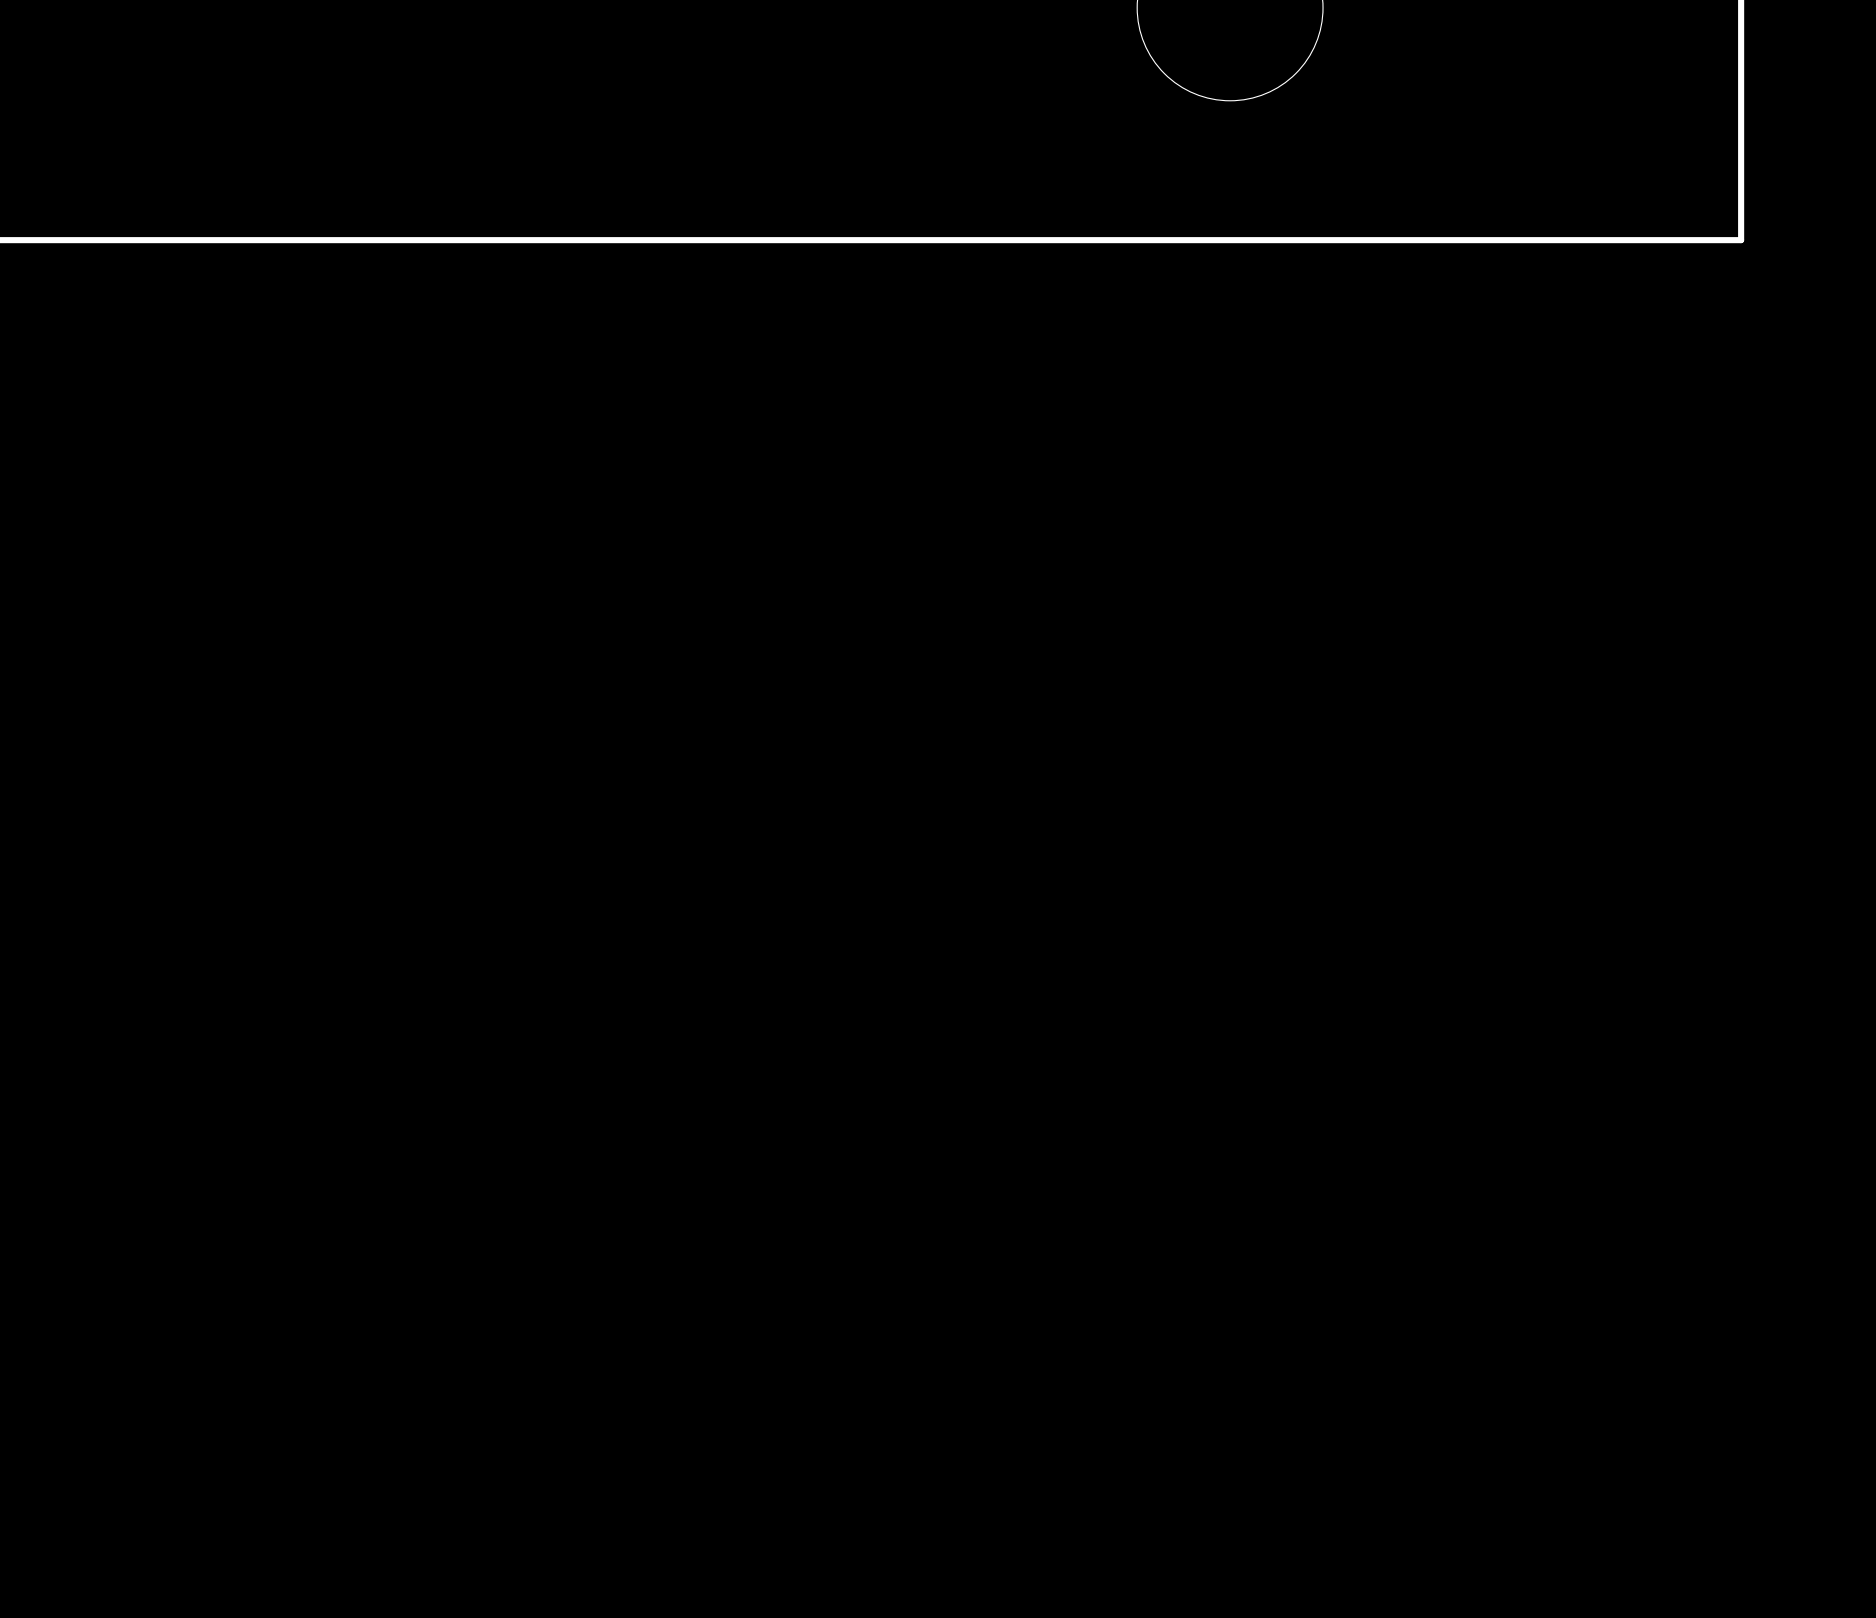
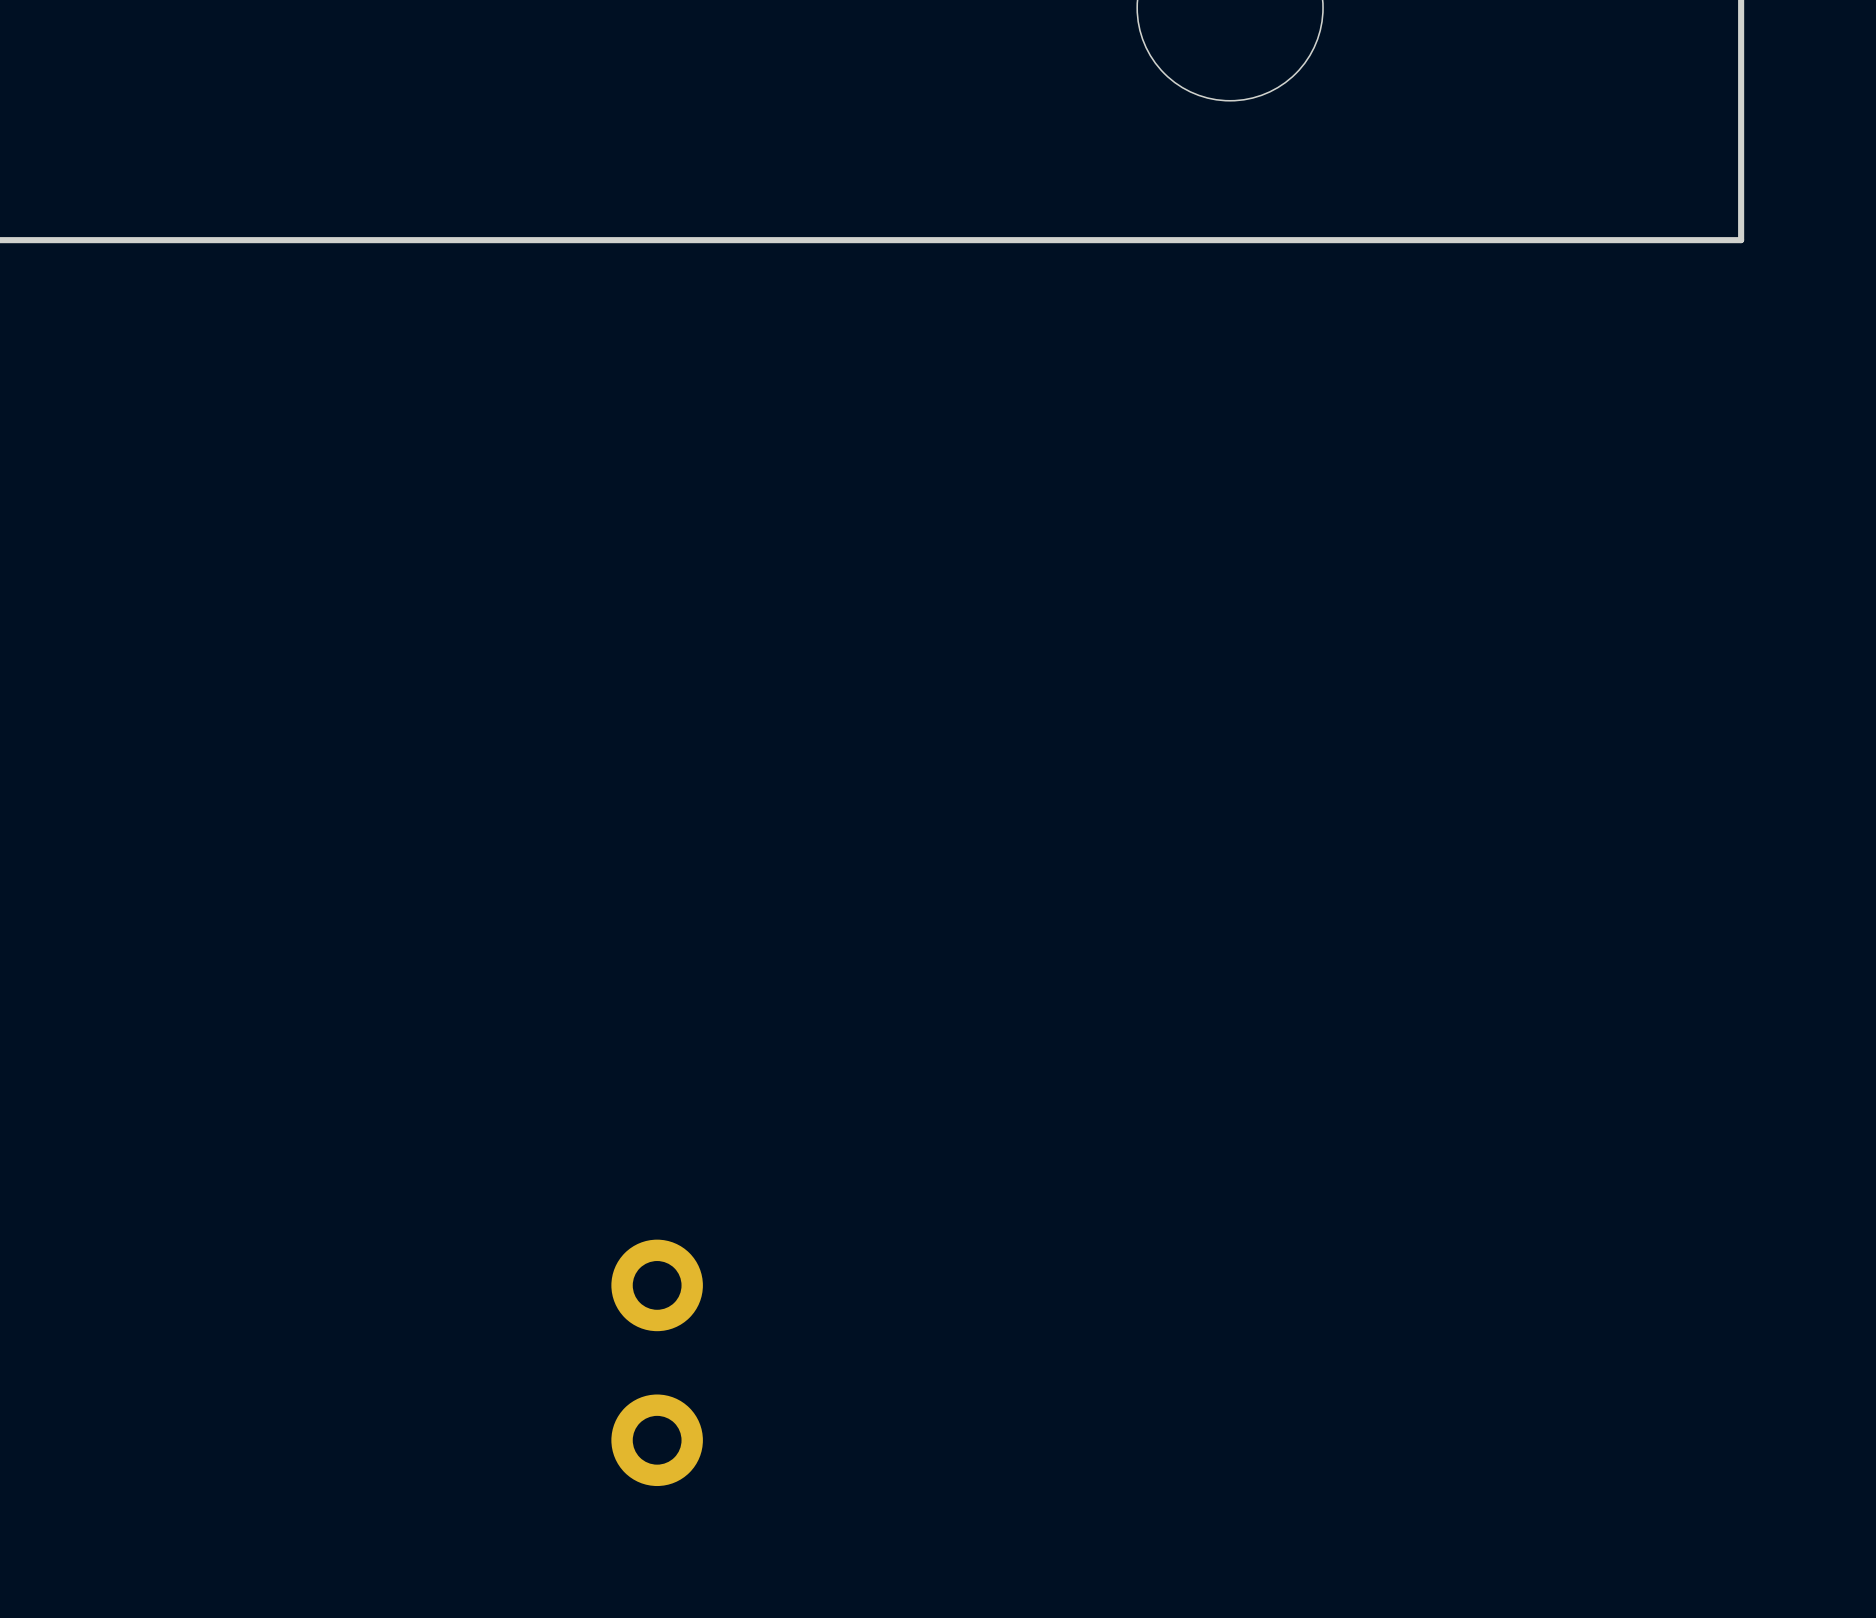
part: none -> (657, 1362)

